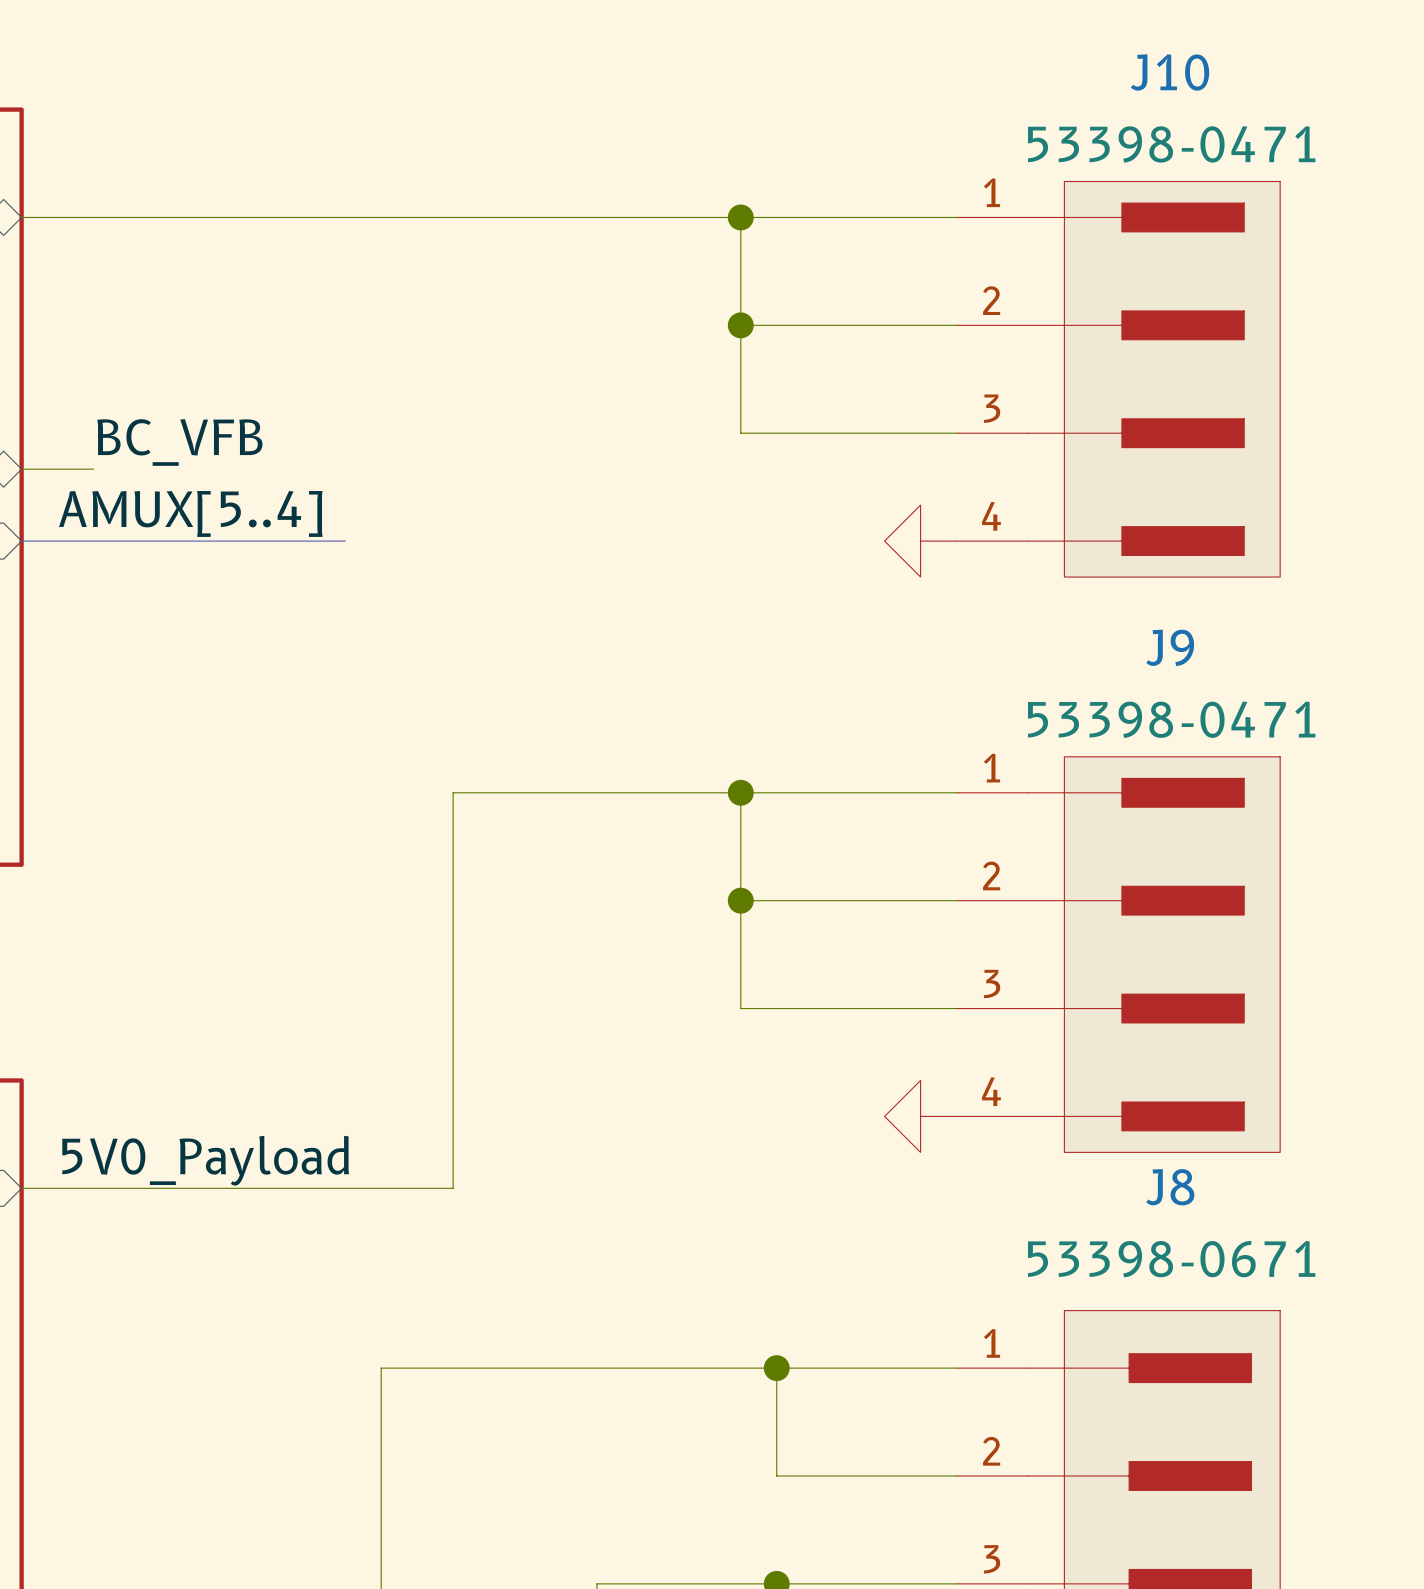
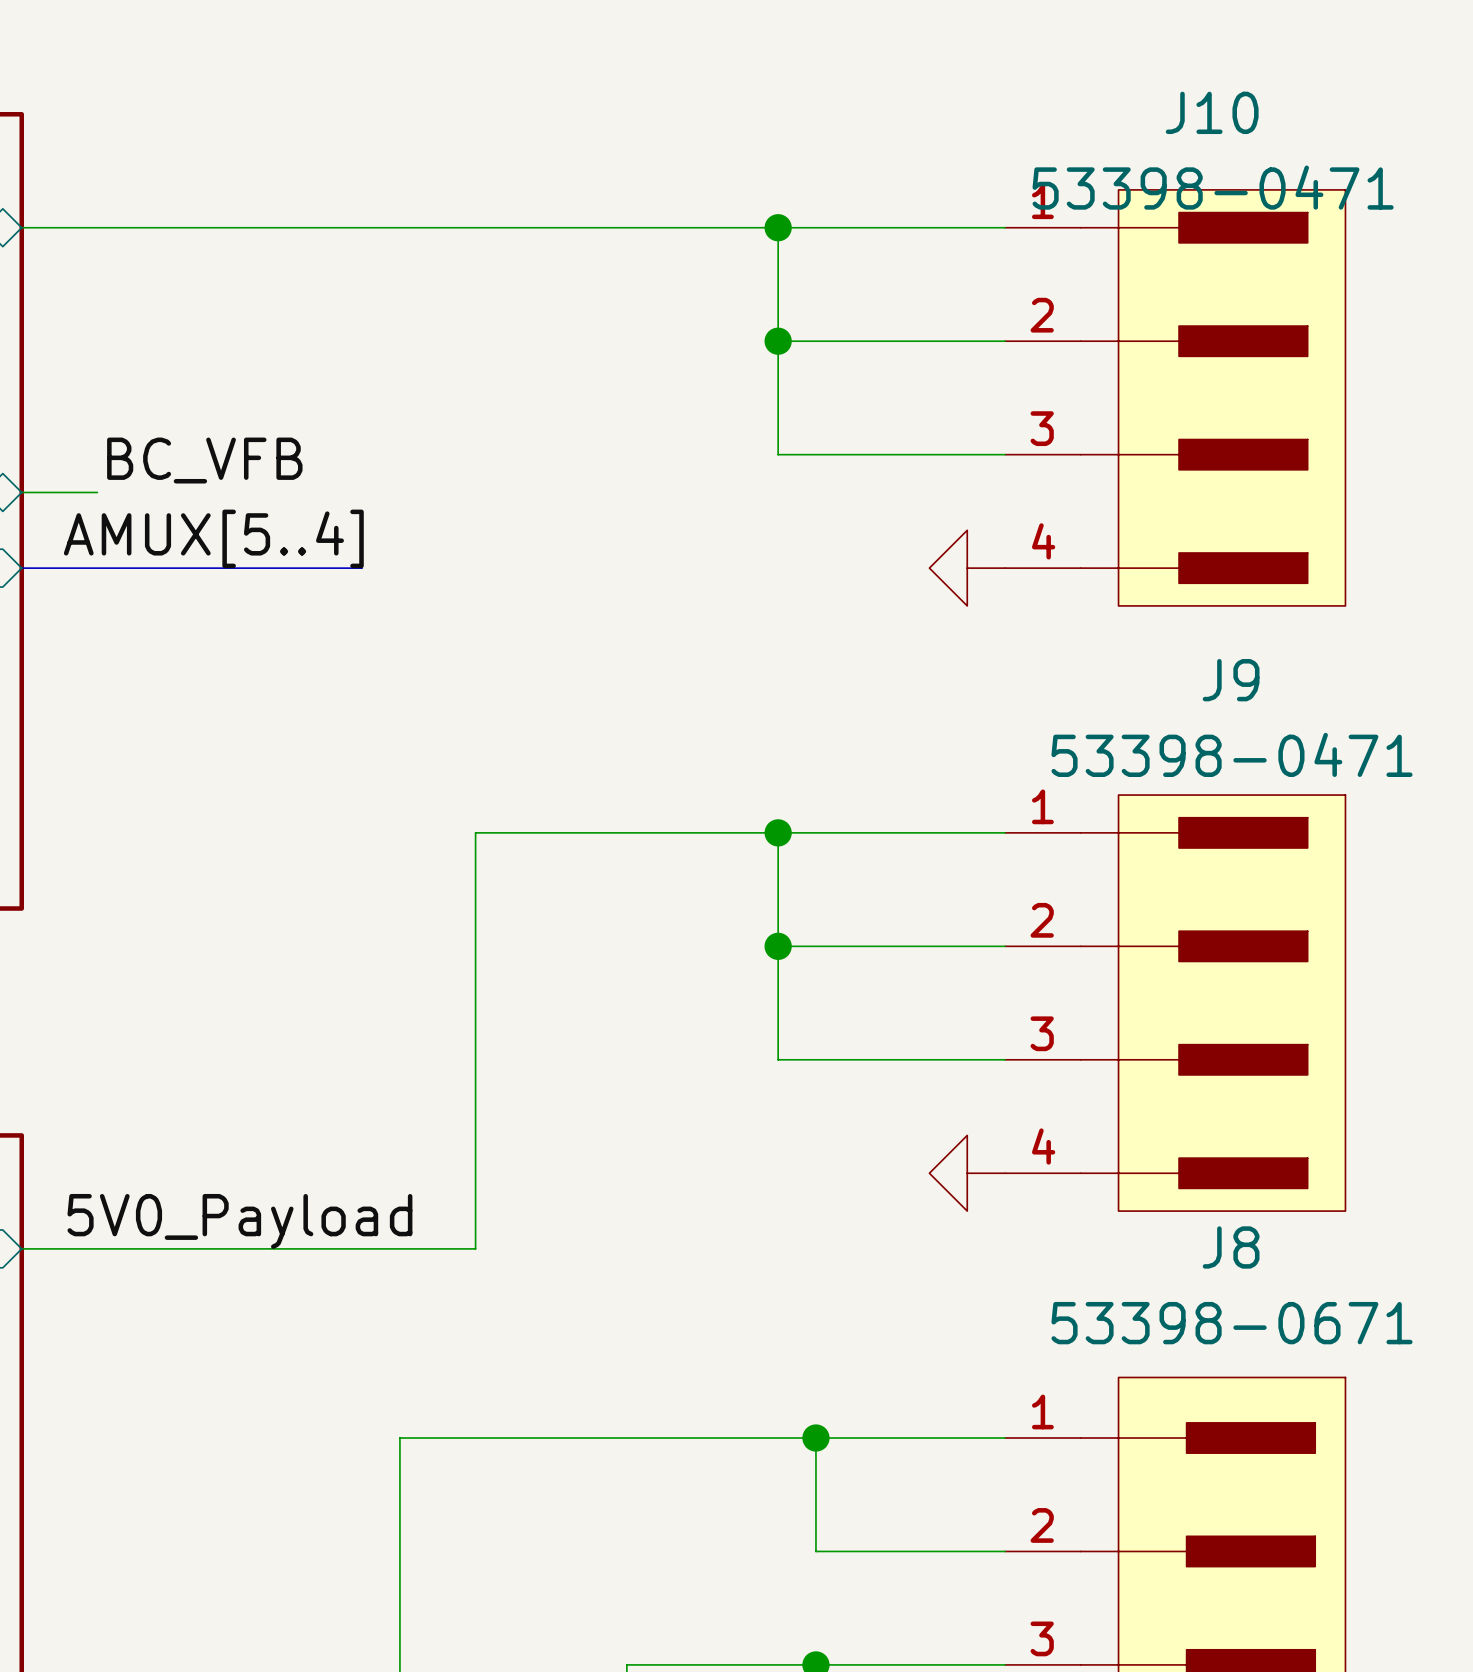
J10 name position: J10 (1170, 72) -> J10 (1212, 112)
J10 value position: 53398-0471 (1171, 144) -> 53398-0471 (1213, 187)

